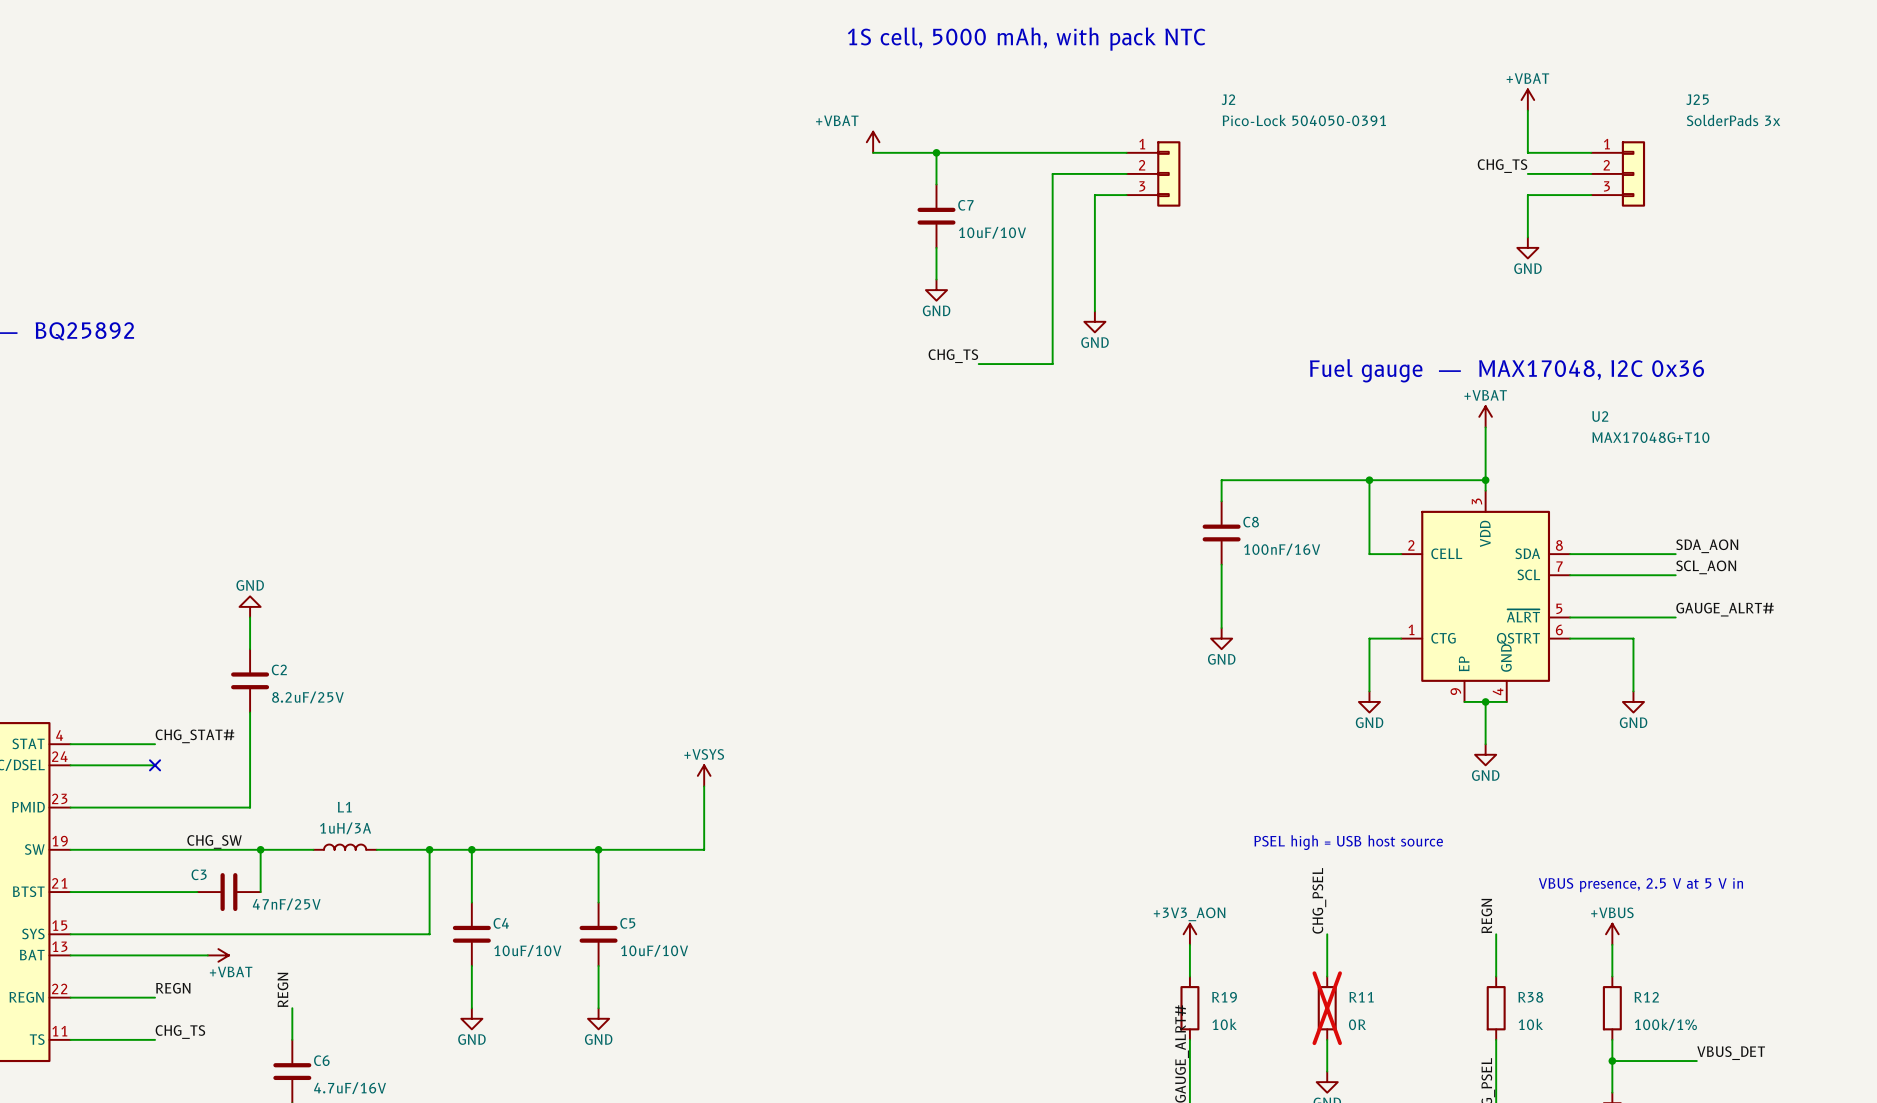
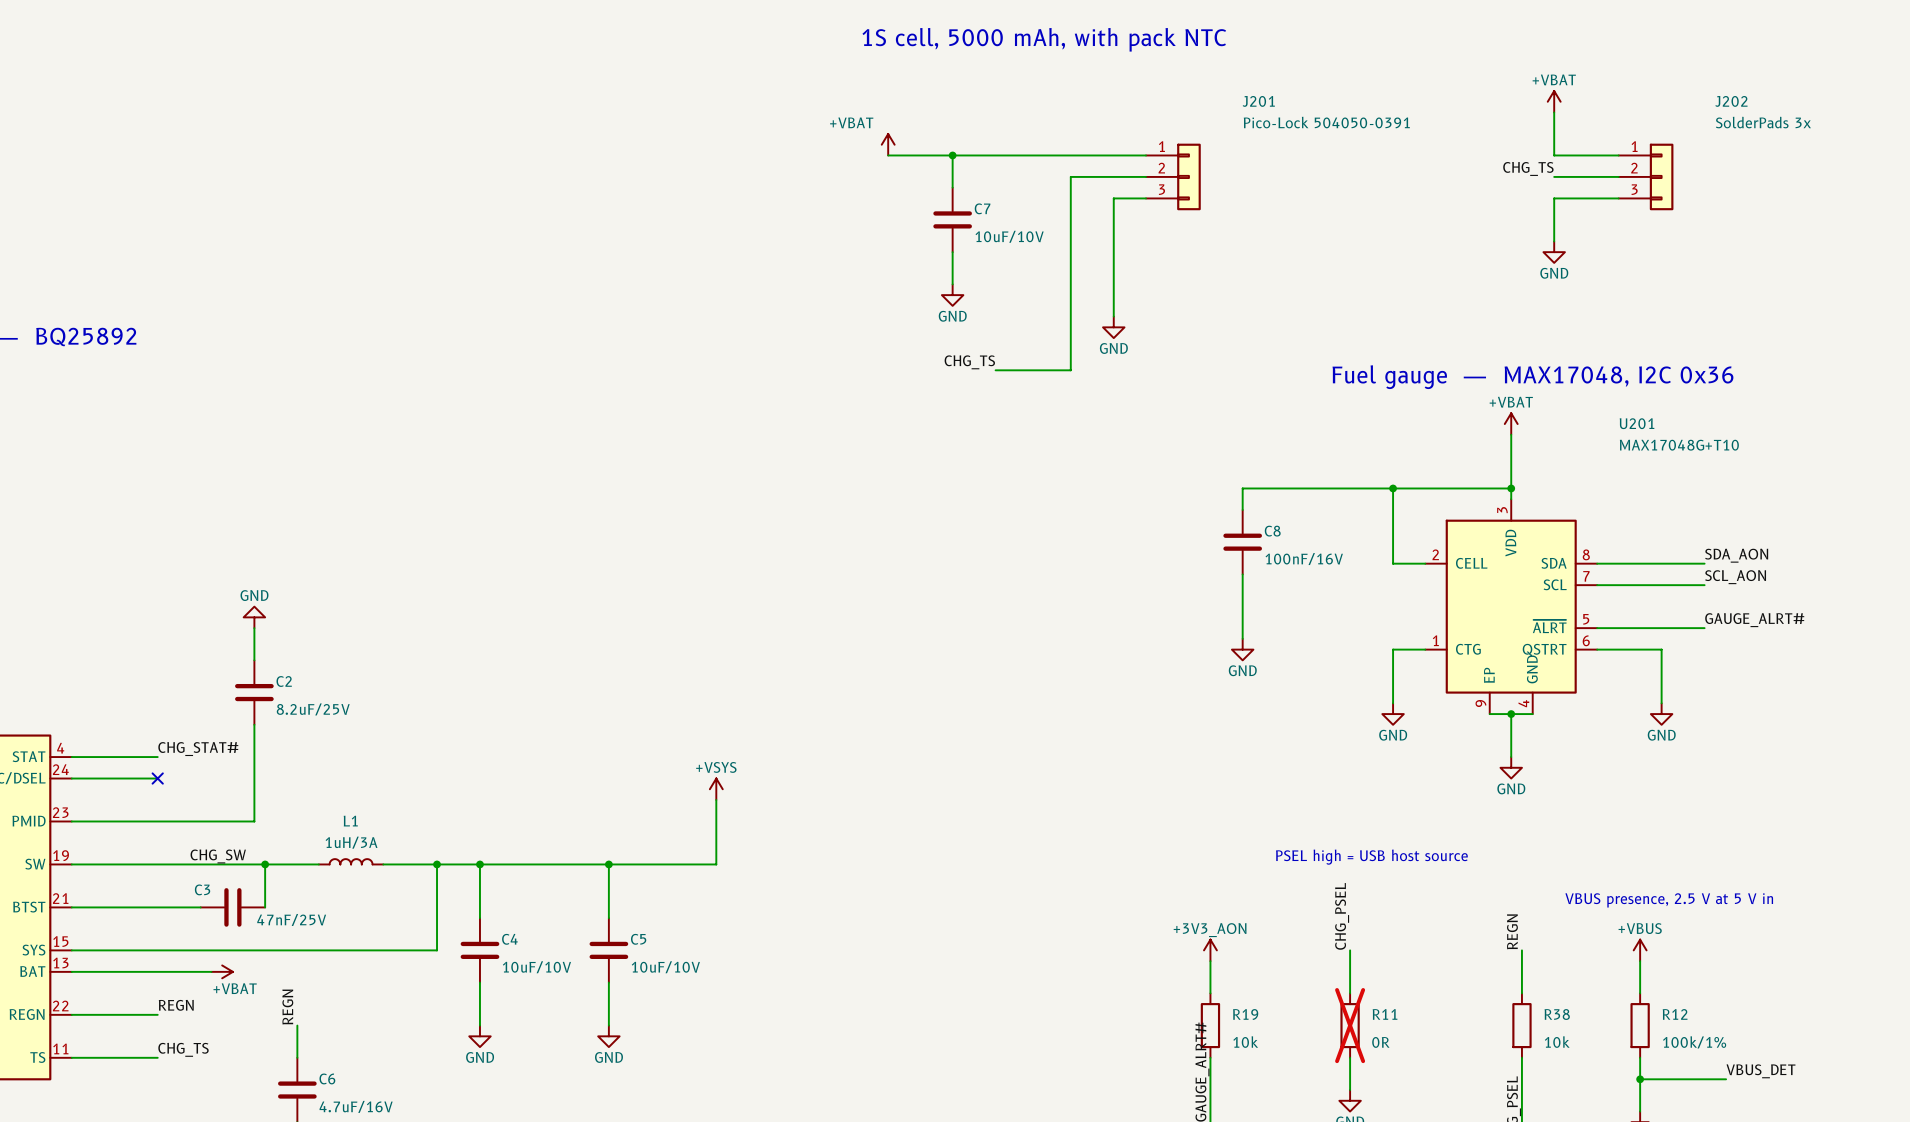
J2 name: J2 (1228, 99) -> J201 (1258, 101)
J25 name: J25 (1697, 99) -> J202 (1731, 101)
U2 name: U2 (1600, 416) -> U201 (1637, 423)

